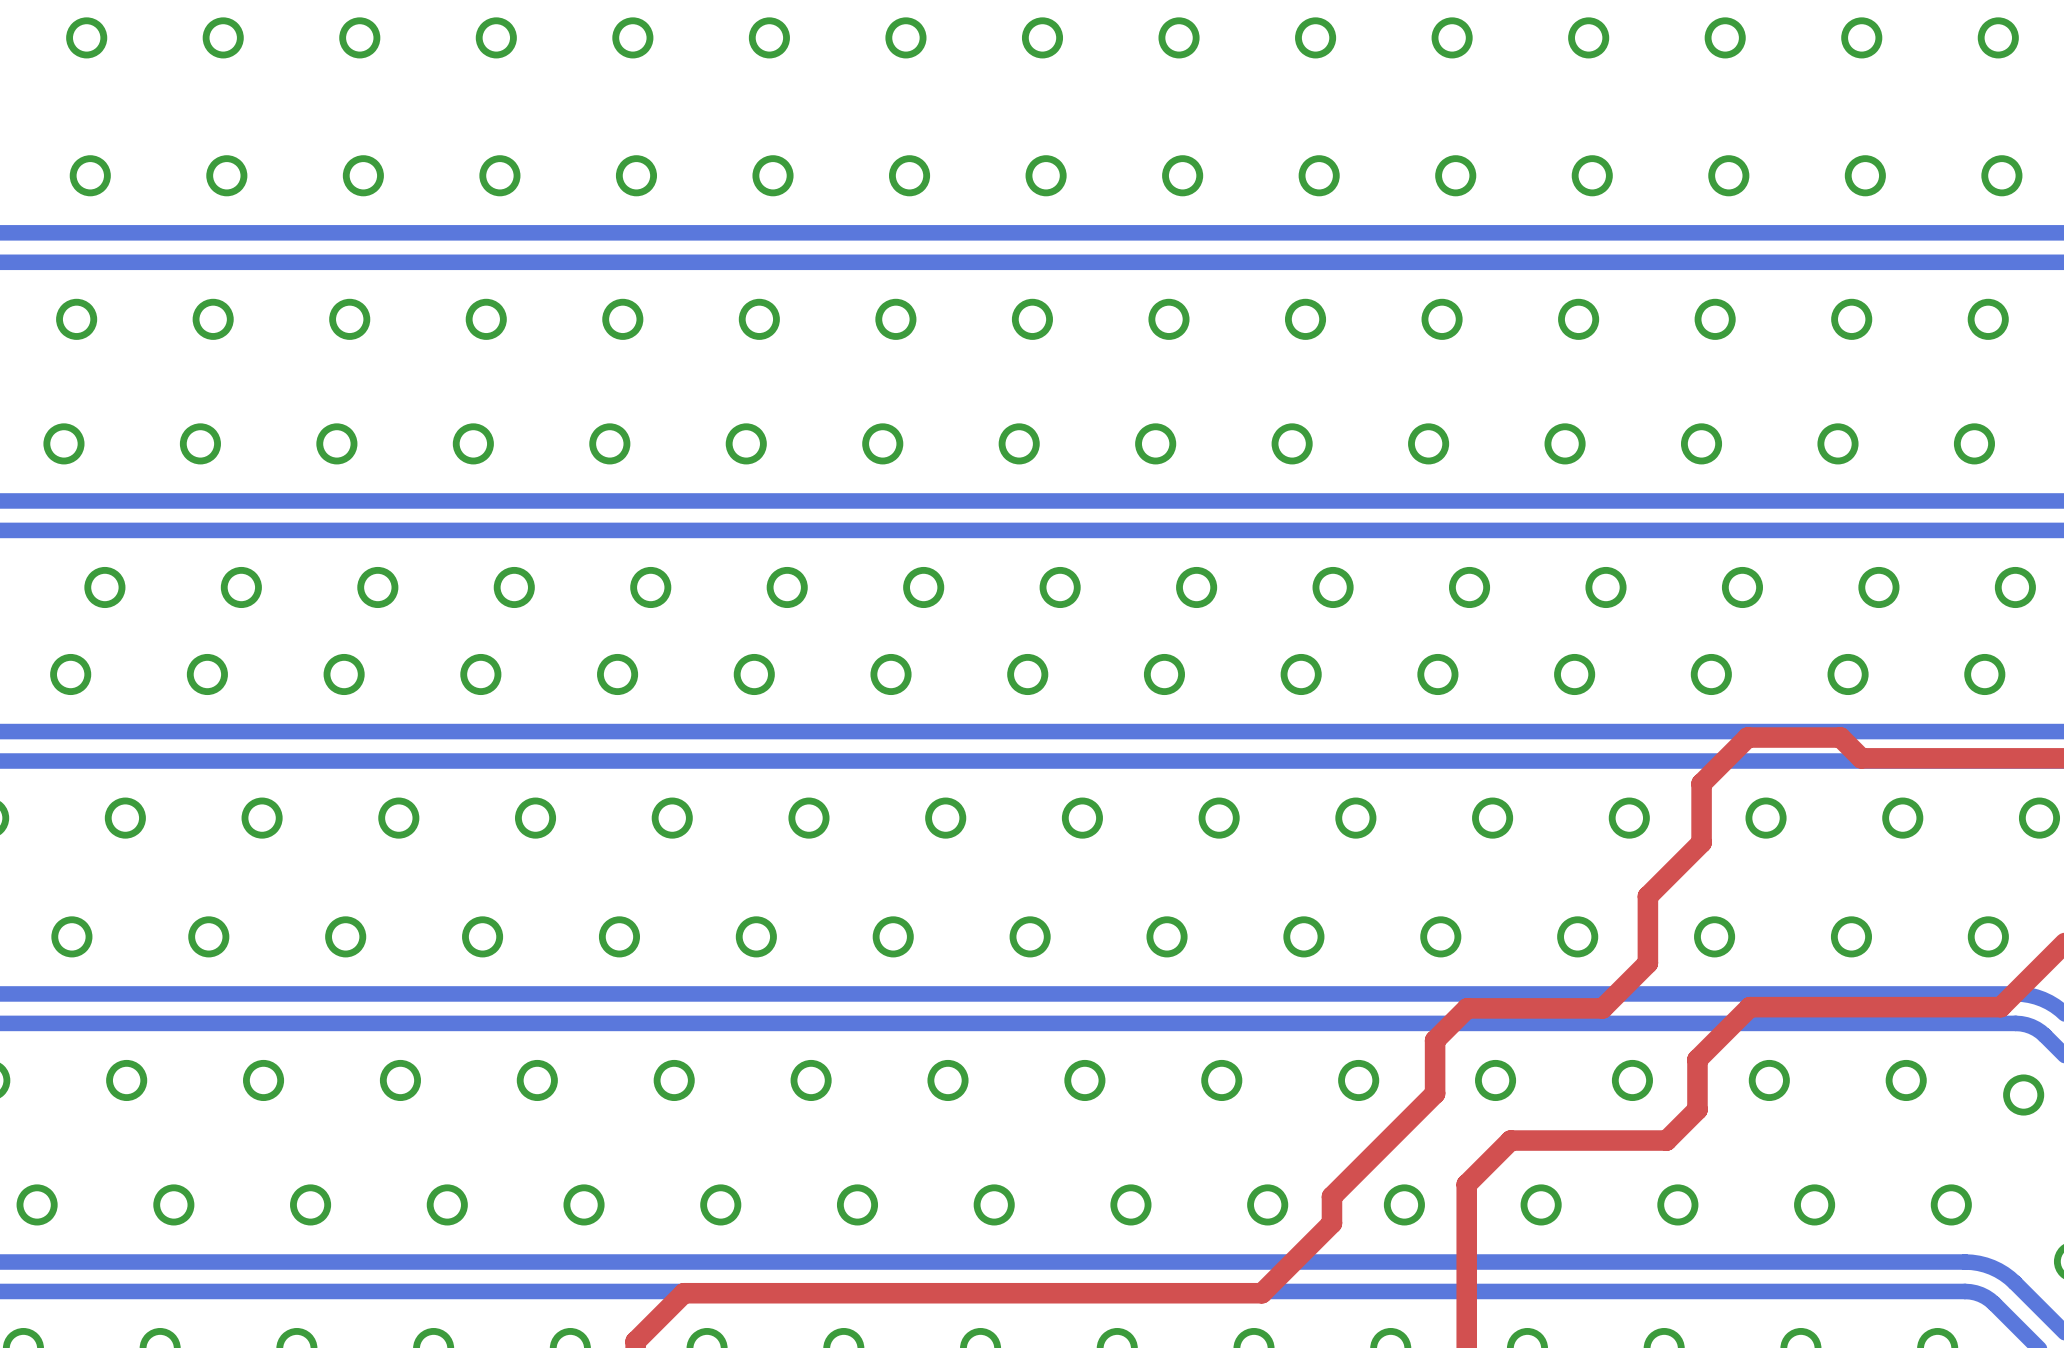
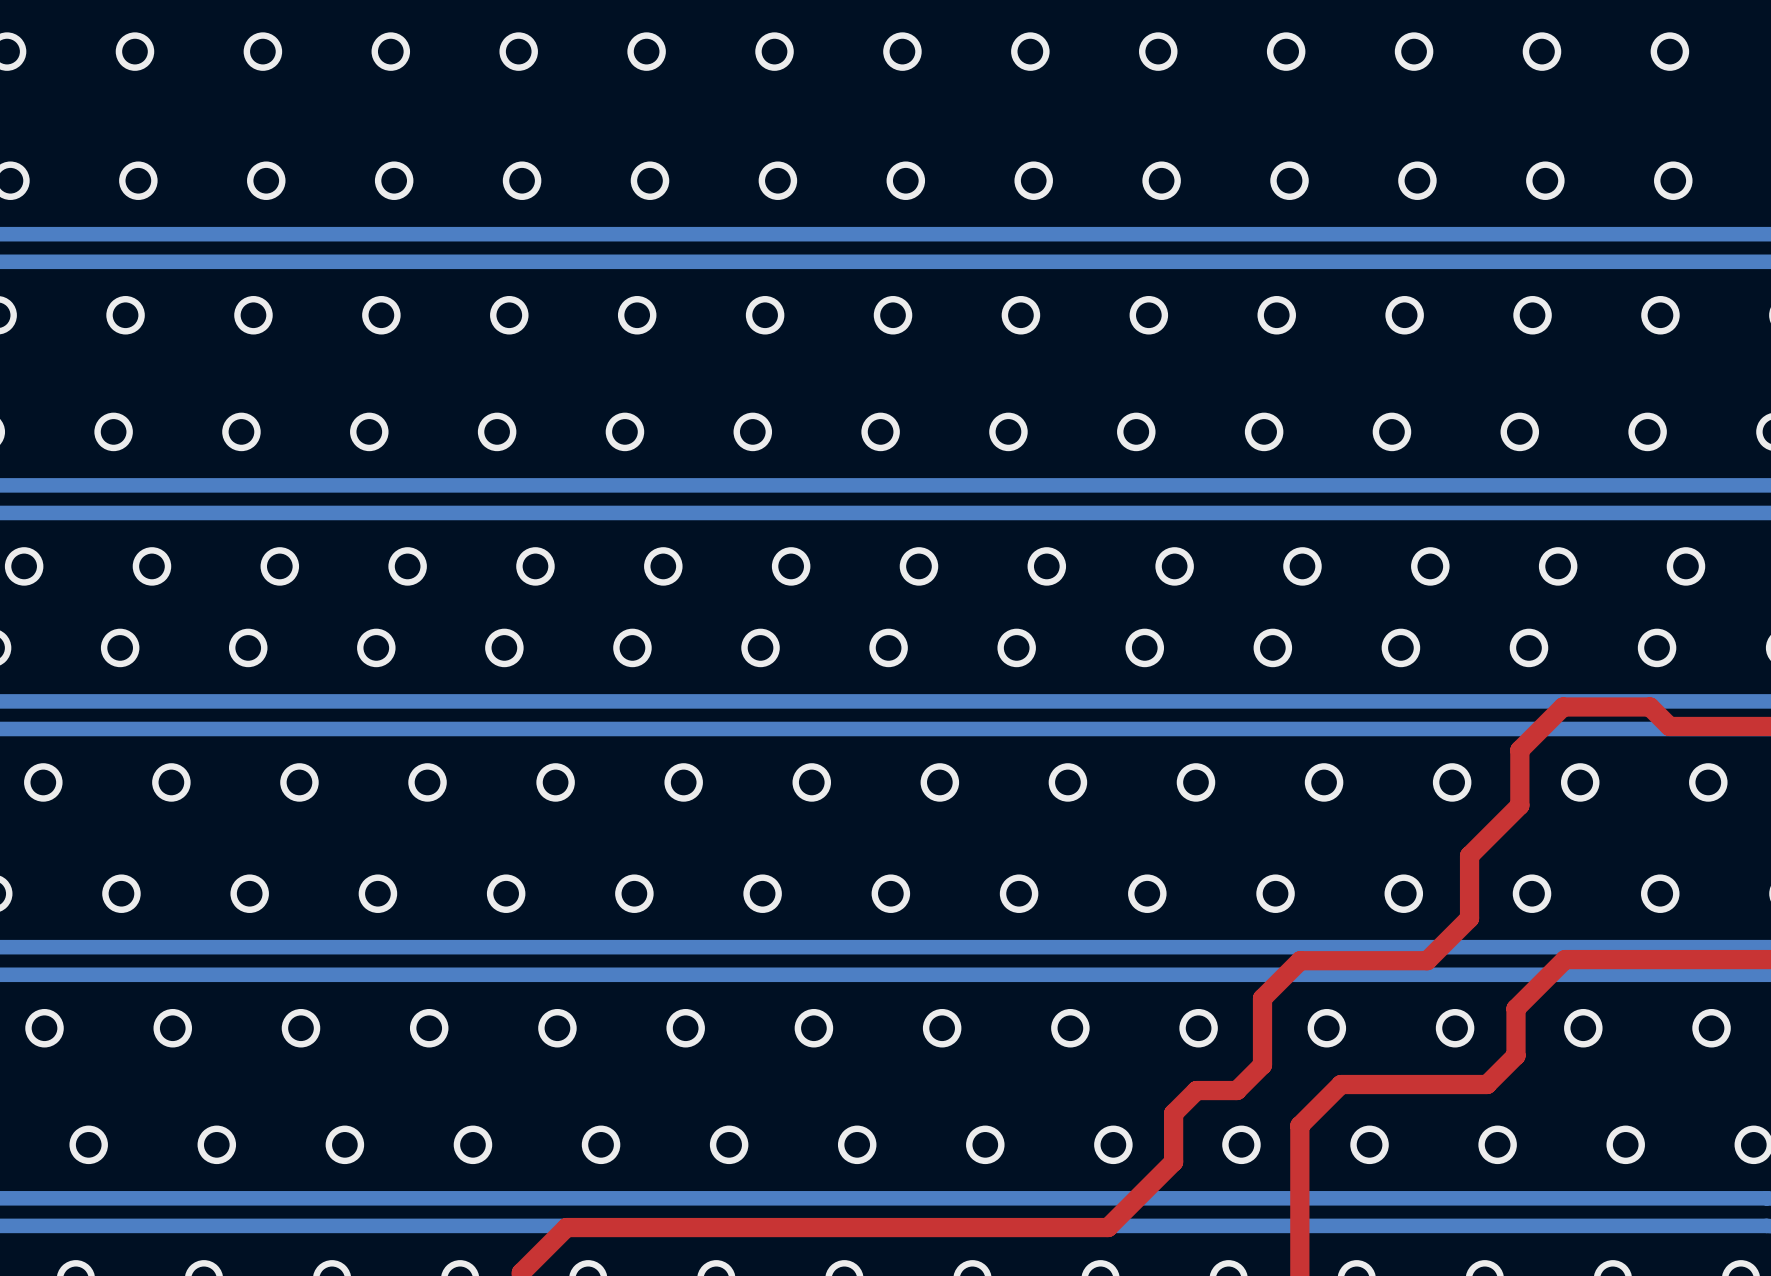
top track: (1435, 1040) (1435, 1093) (1331, 1196) -> (1270, 990) (1262, 998) (1262, 1065) (1236, 1090) (1196, 1090) (1173, 1113) (1173, 1137)

